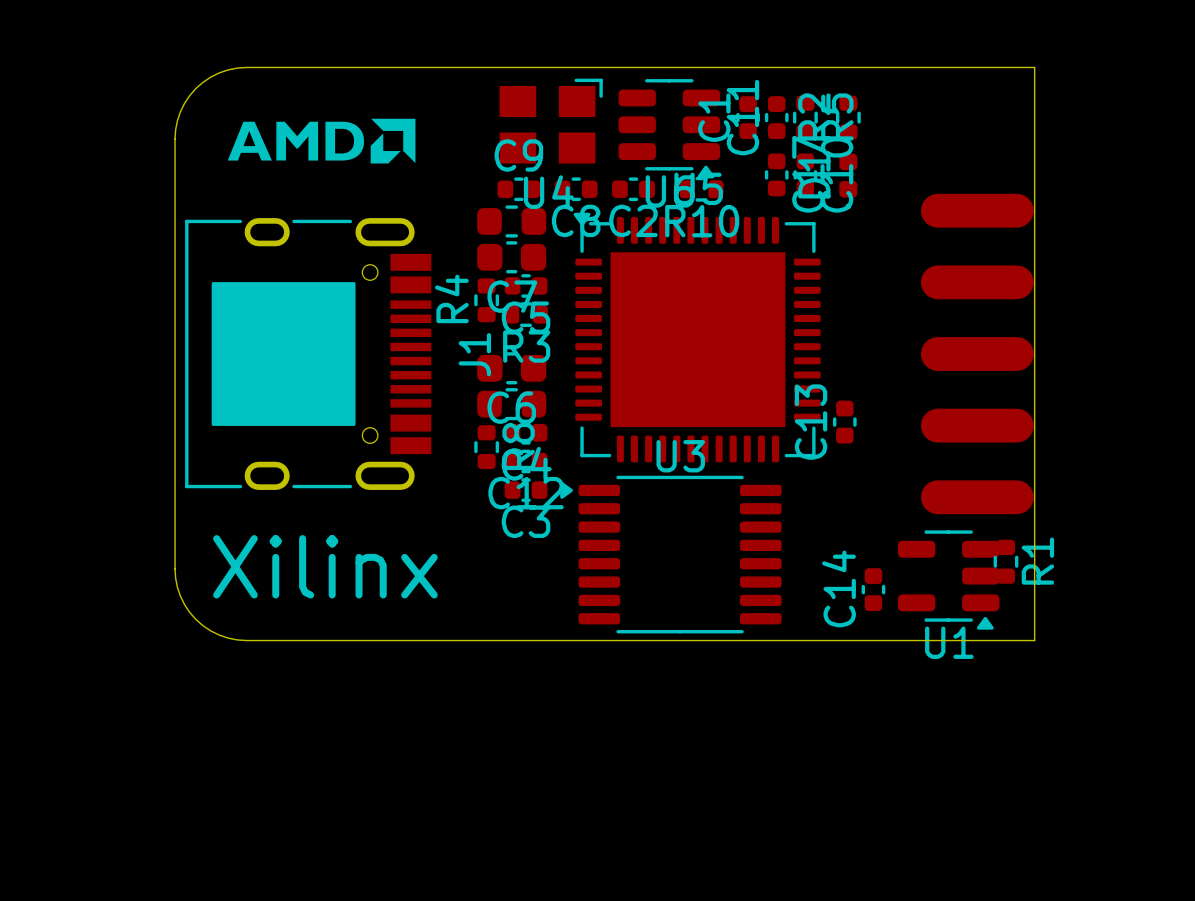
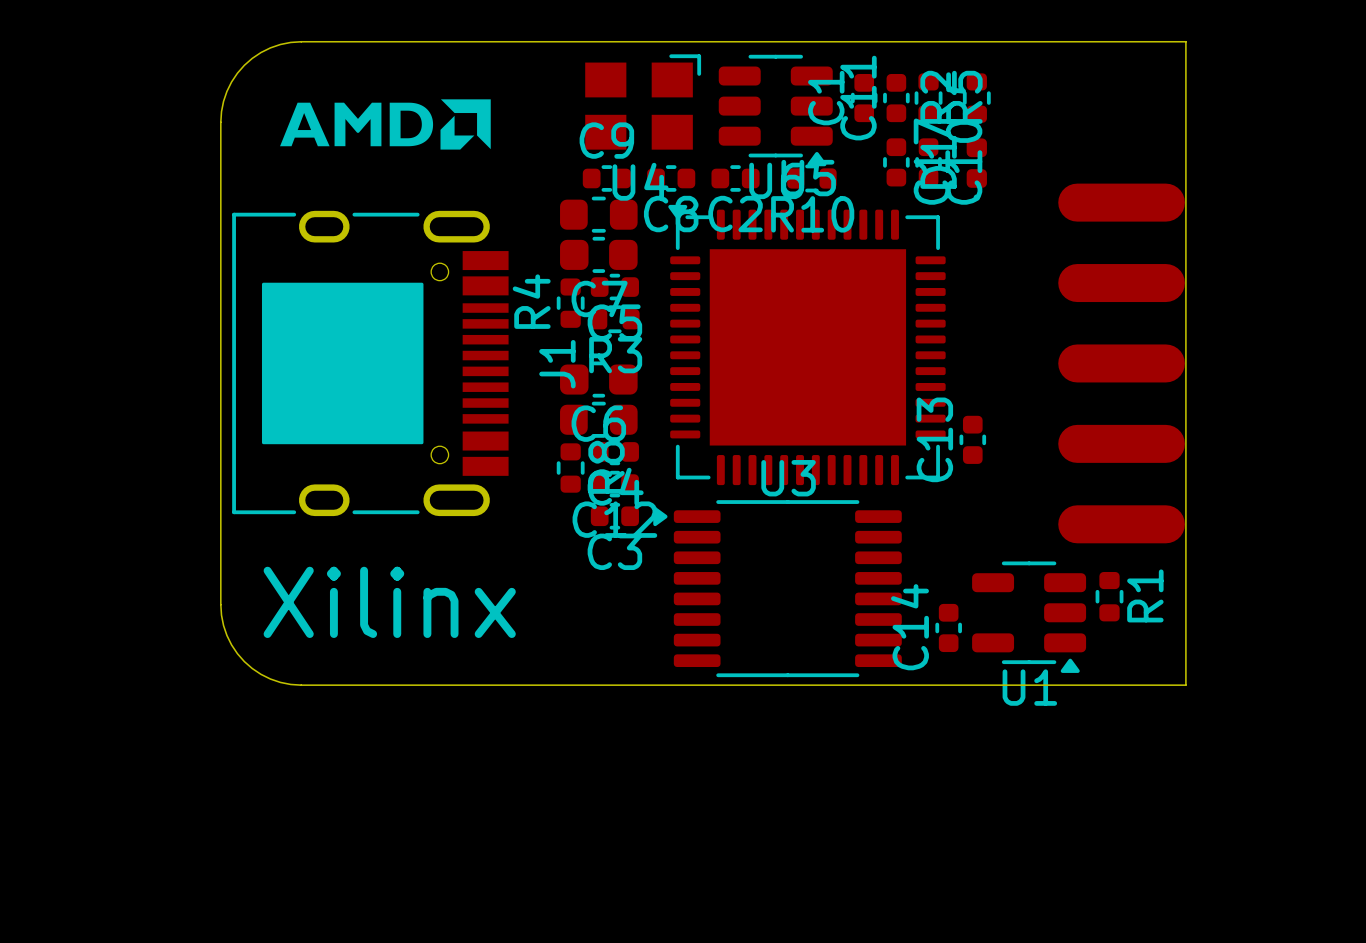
R1 position: (1005, 561) -> (1109, 596)
U1 position: (948, 580) -> (1029, 617)
C14 position: (873, 589) -> (948, 627)

